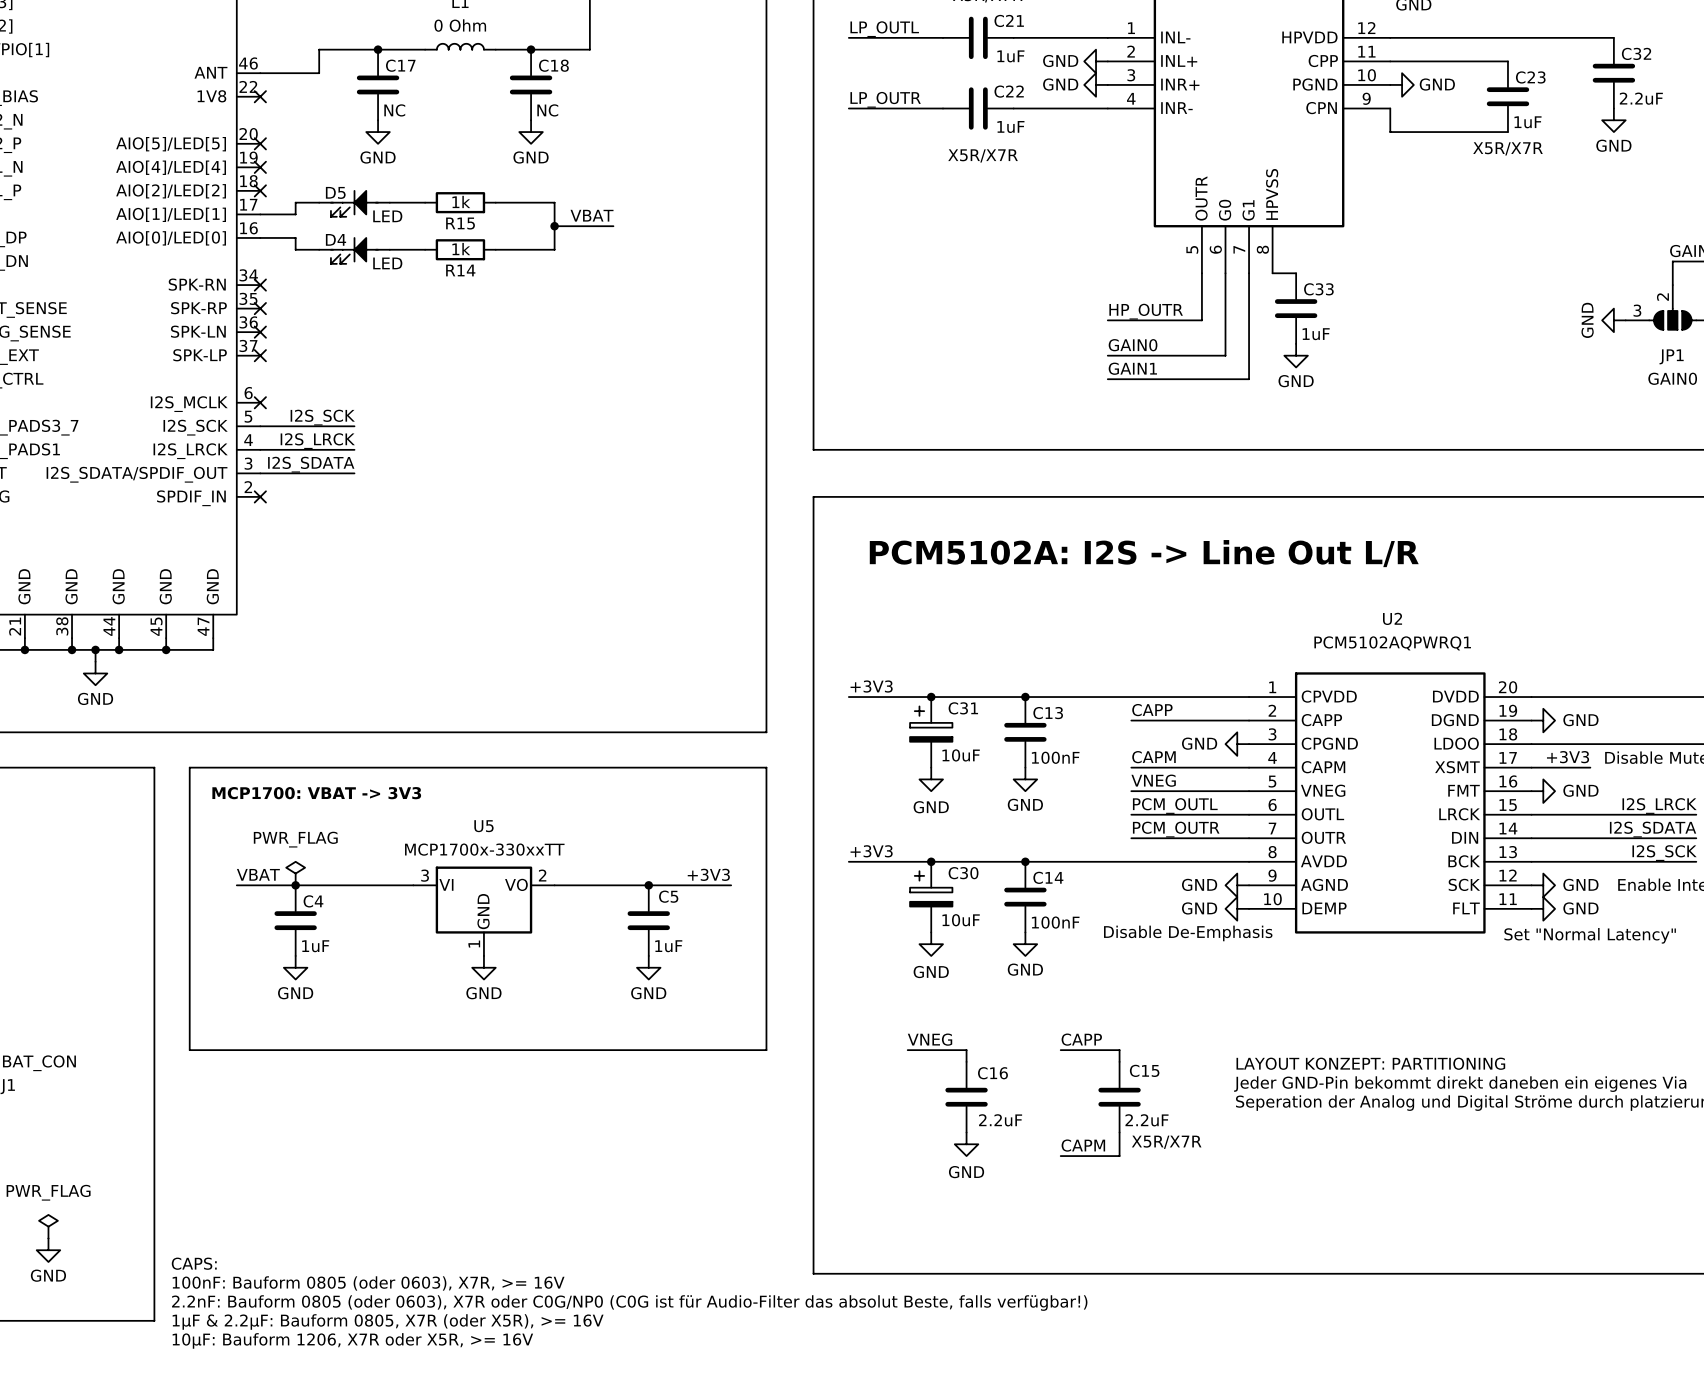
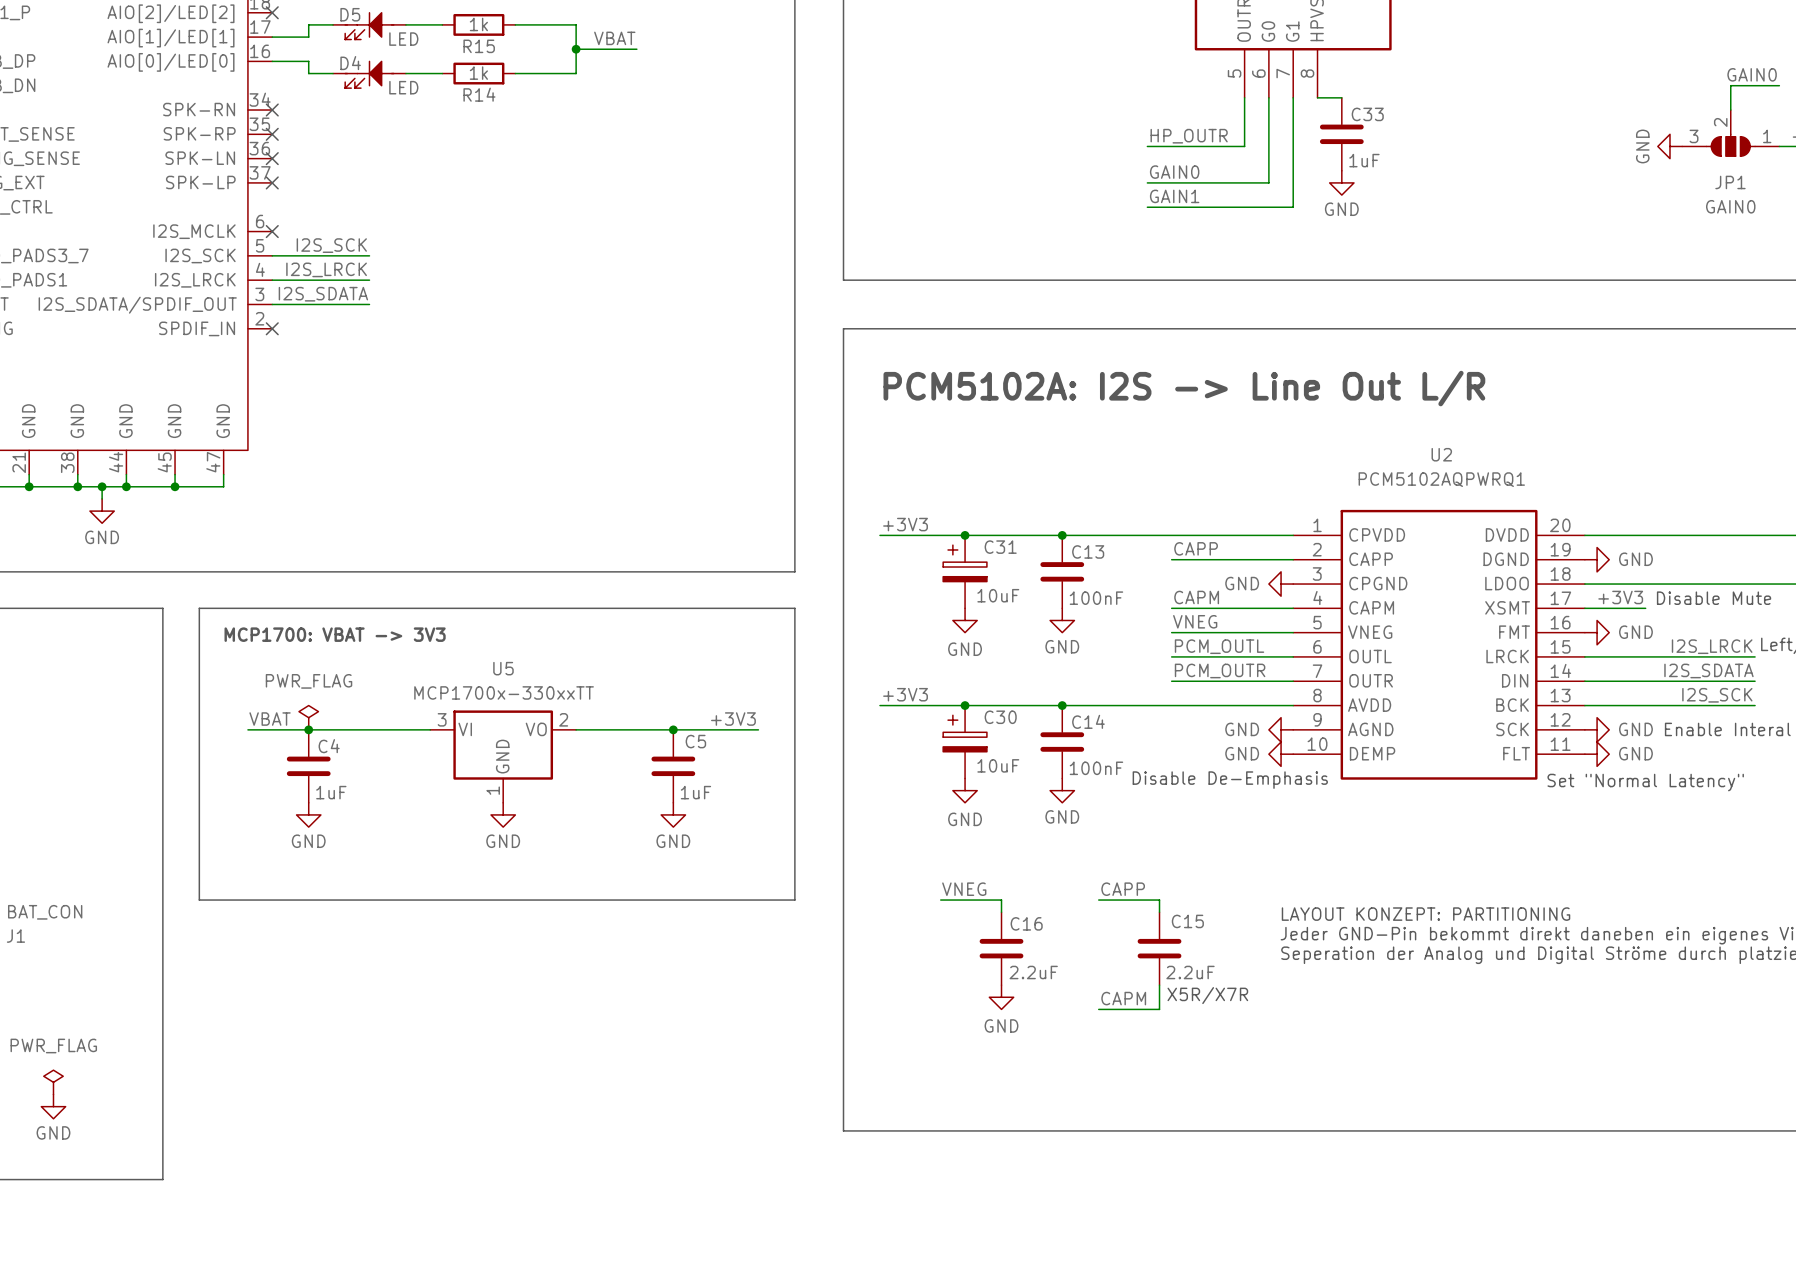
text: CAPS: (194, 1263) -> none
text: 100nF: Bauform 0805 (oder 0603), X7R, >= 16V (368, 1283) -> none
text: 2.2nF: Bauform 0805 (oder 0603), X7R oder C0G/NP0 (C0G ist für Audio-Filter das absolut Beste, falls verfügbar!) (629, 1303) -> none
text: 1μF & 2.2μF: Bauform 0805, X7R (oder X5R), >= 16V (388, 1321) -> none
text: 10μF: Bauform 1206, X7R oder X5R, >= 16V (352, 1340) -> none

